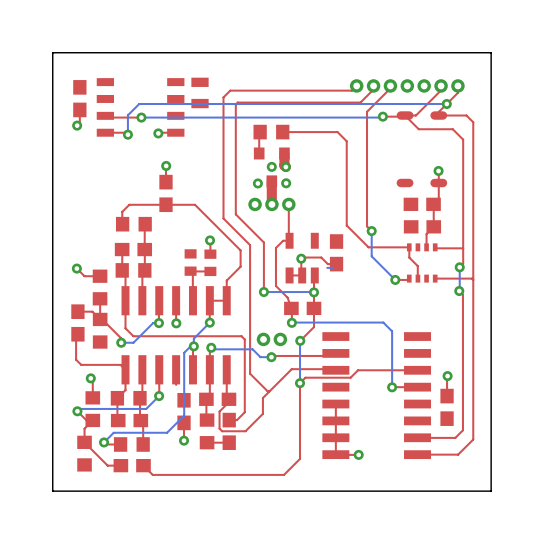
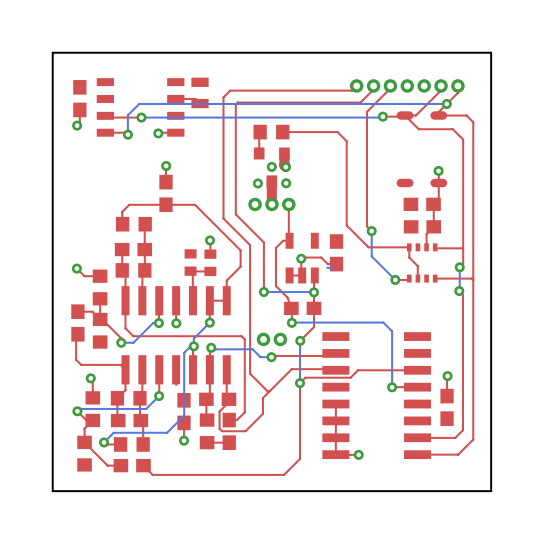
top track: none -> (175, 98) (195, 98) (200, 103)

